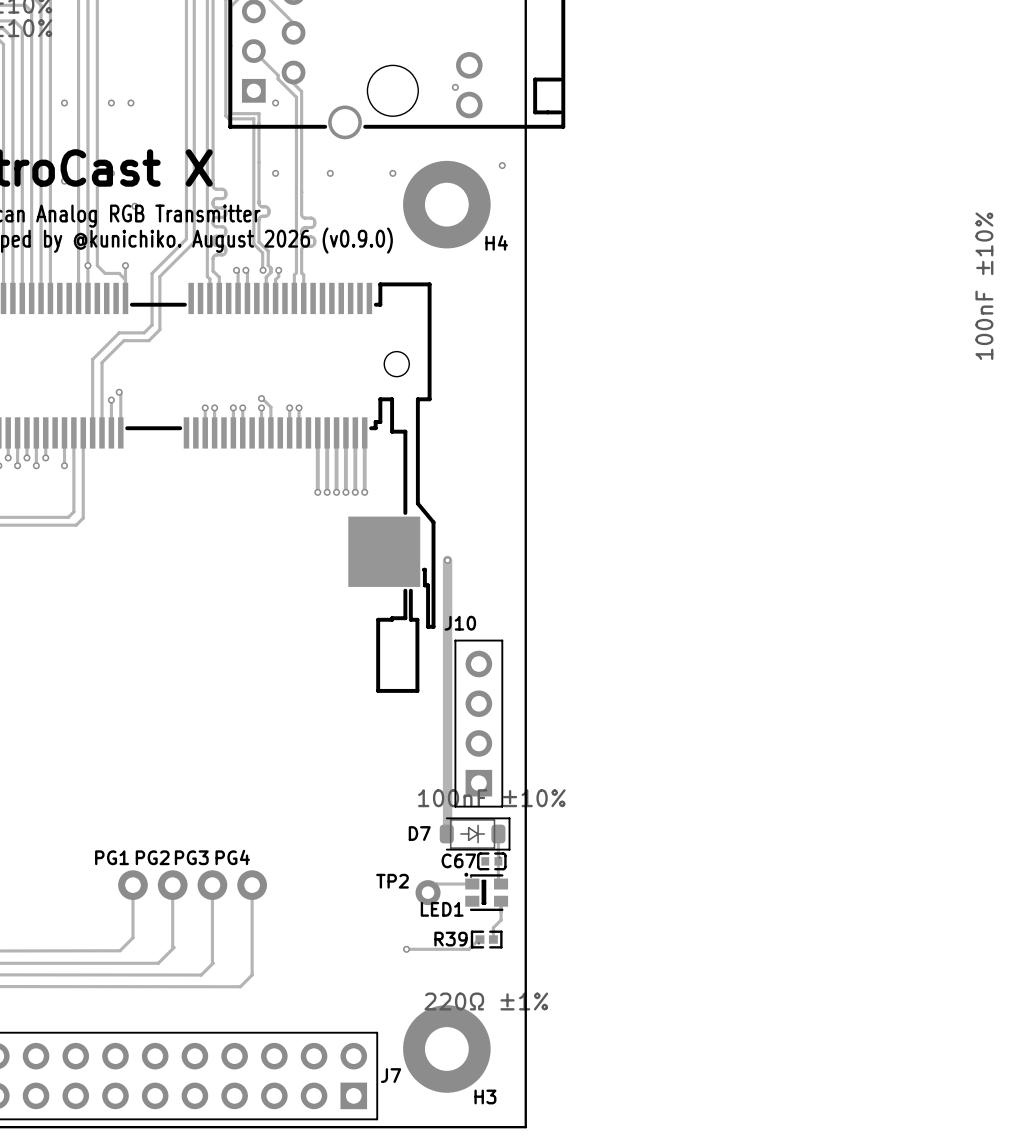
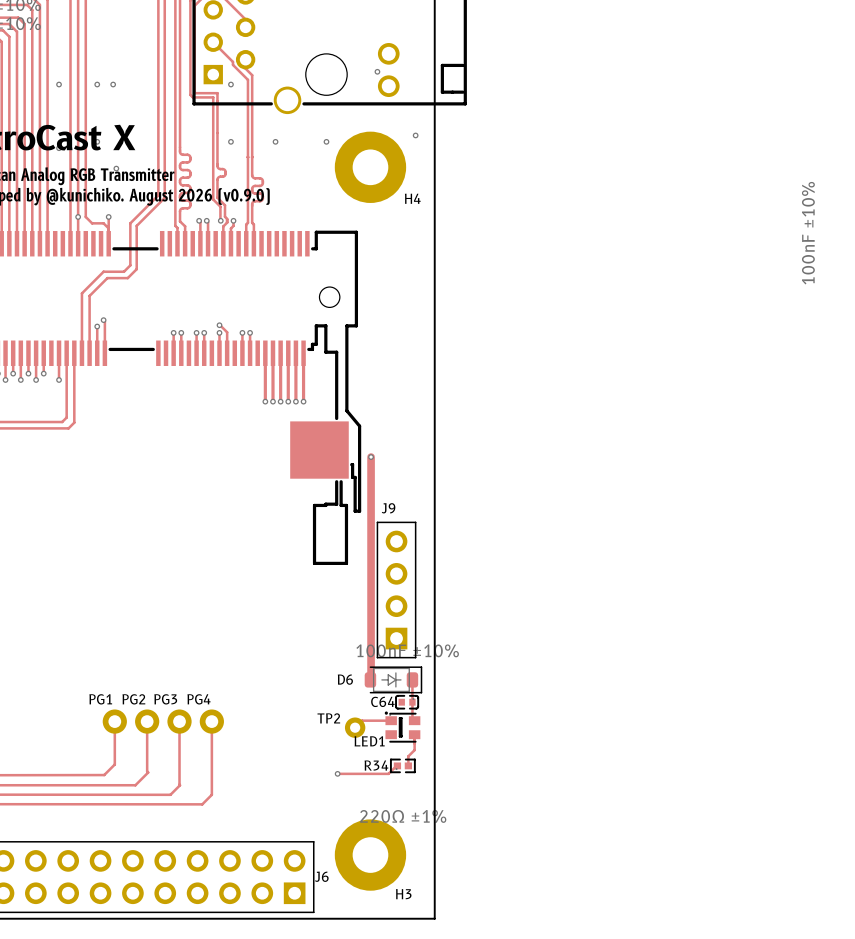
J10 name: J10 (460, 623) -> J9 (388, 508)
D7 name: D7 (419, 833) -> D6 (345, 679)
C67 name: C67 (458, 860) -> C64 (382, 701)
R39 name: R39 (451, 939) -> R34 (376, 765)
J7 name: J7 (391, 1075) -> J6 (321, 876)

